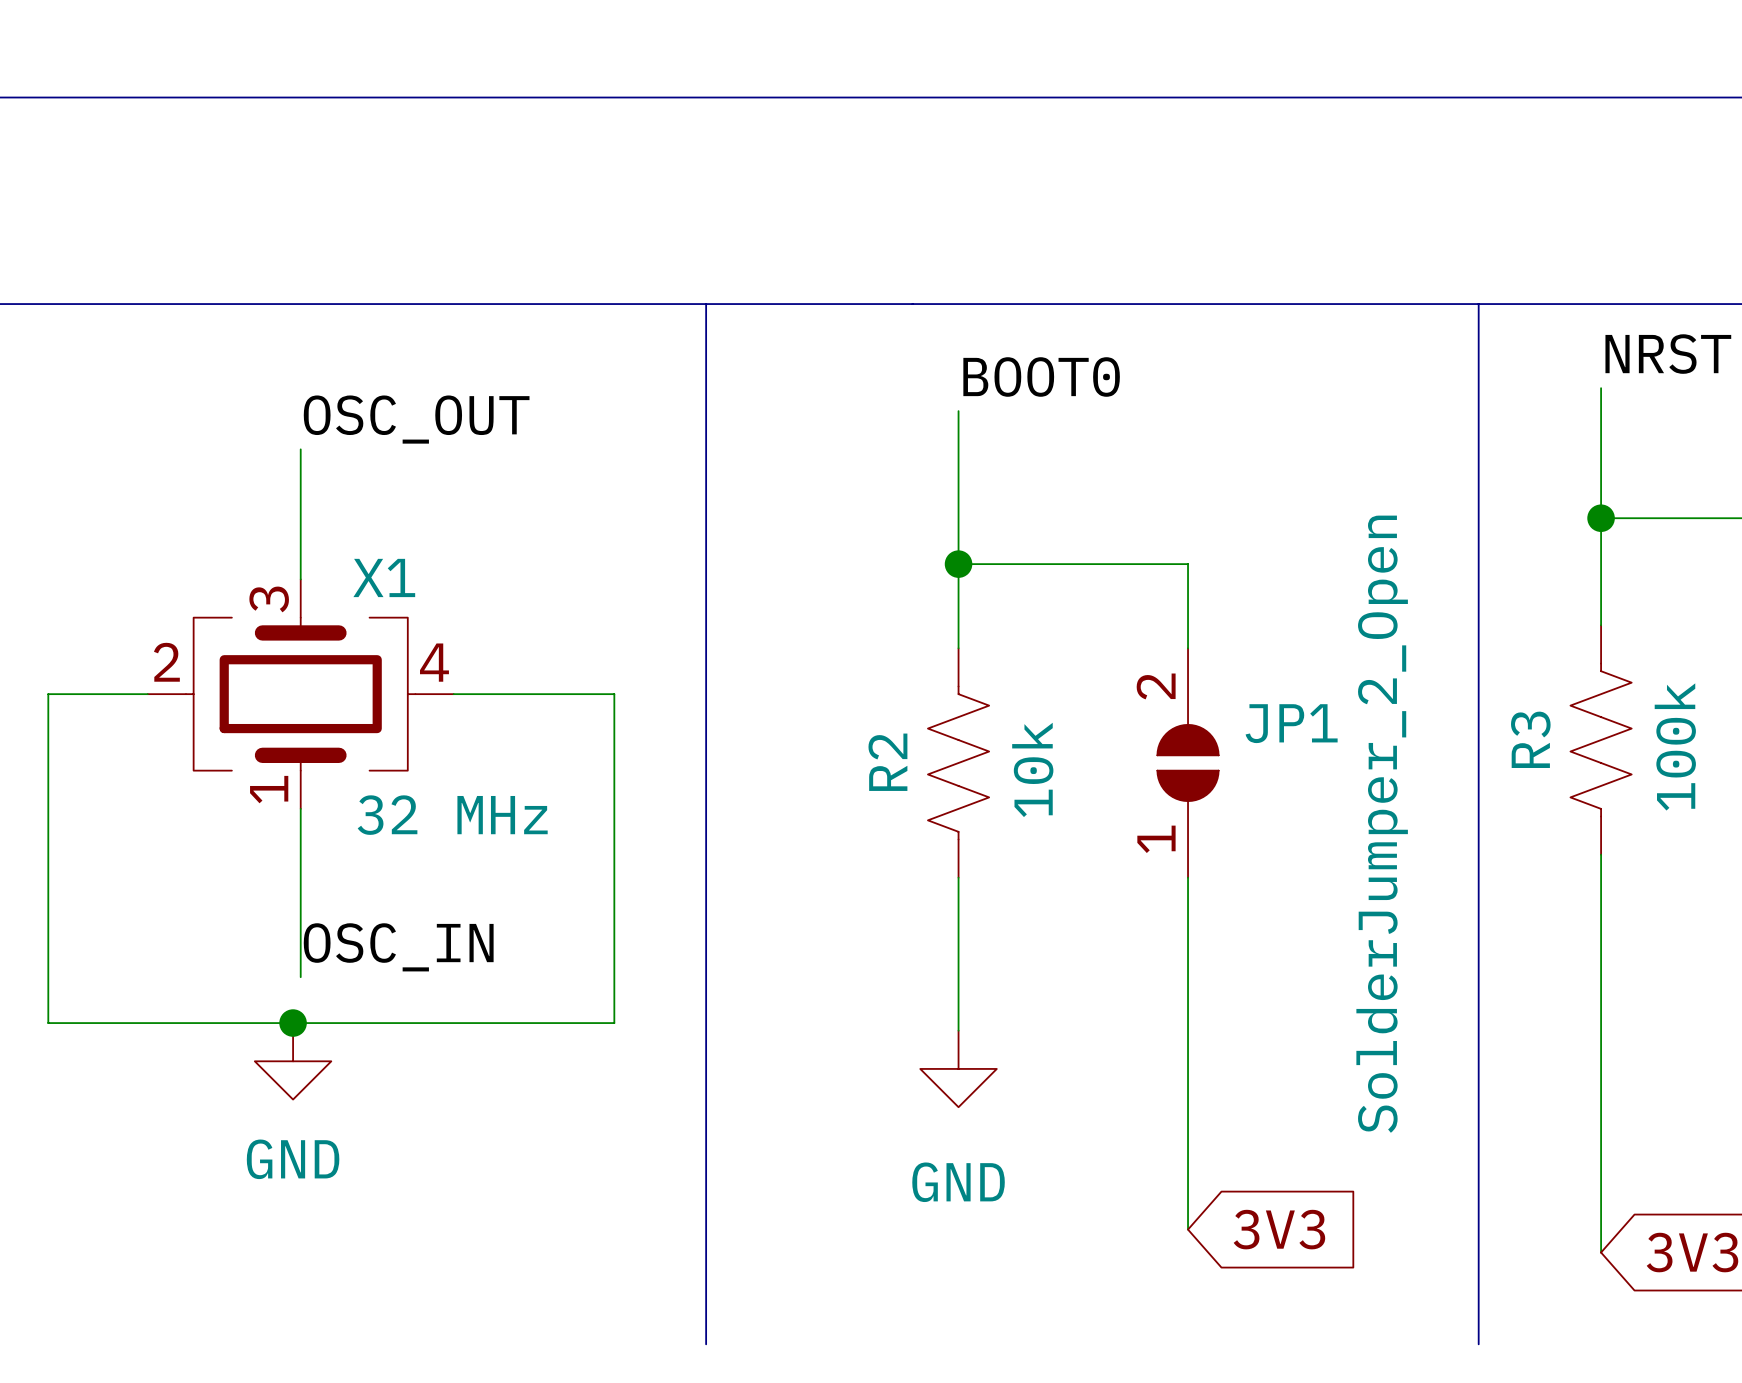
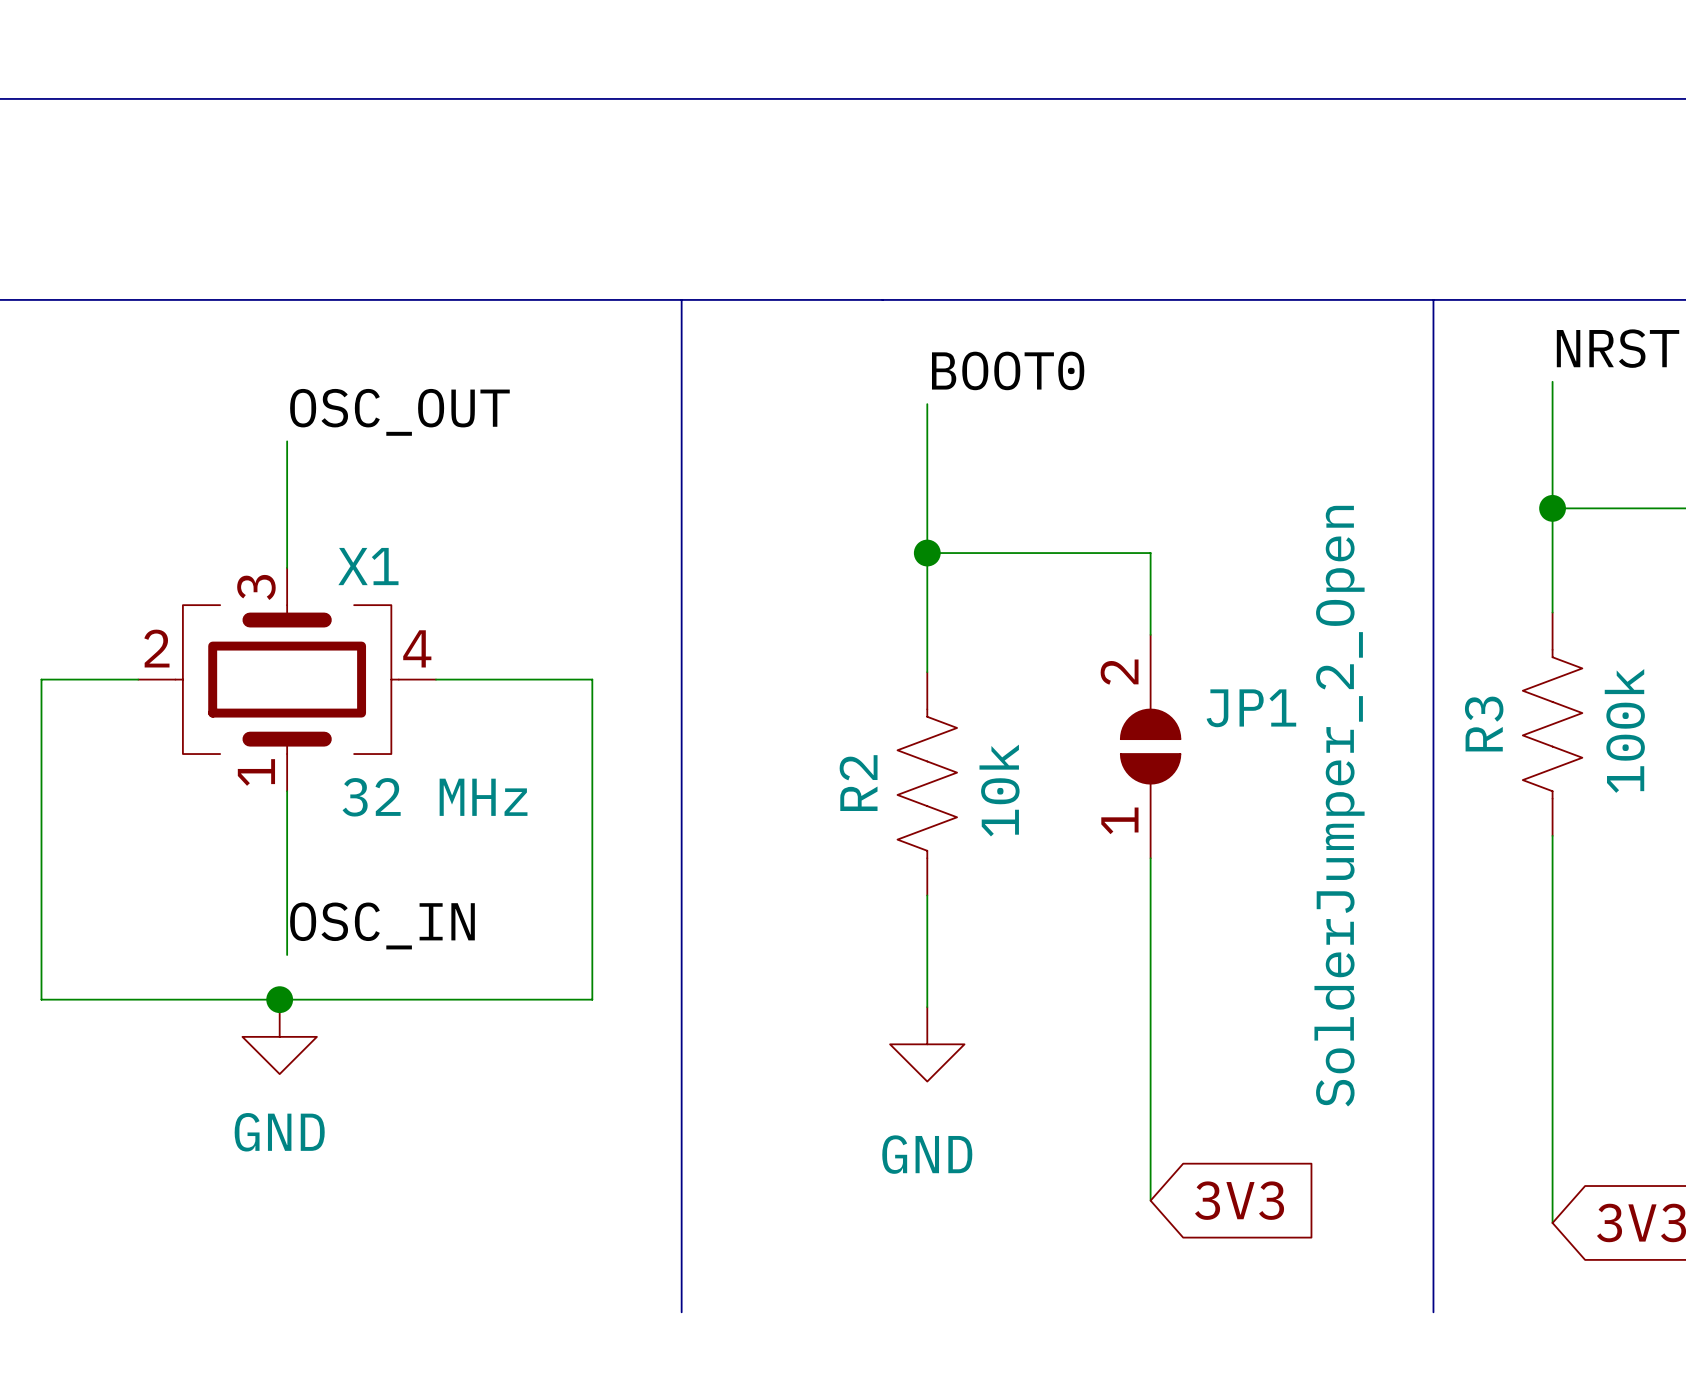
R2 position: (958, 762) -> (927, 783)

